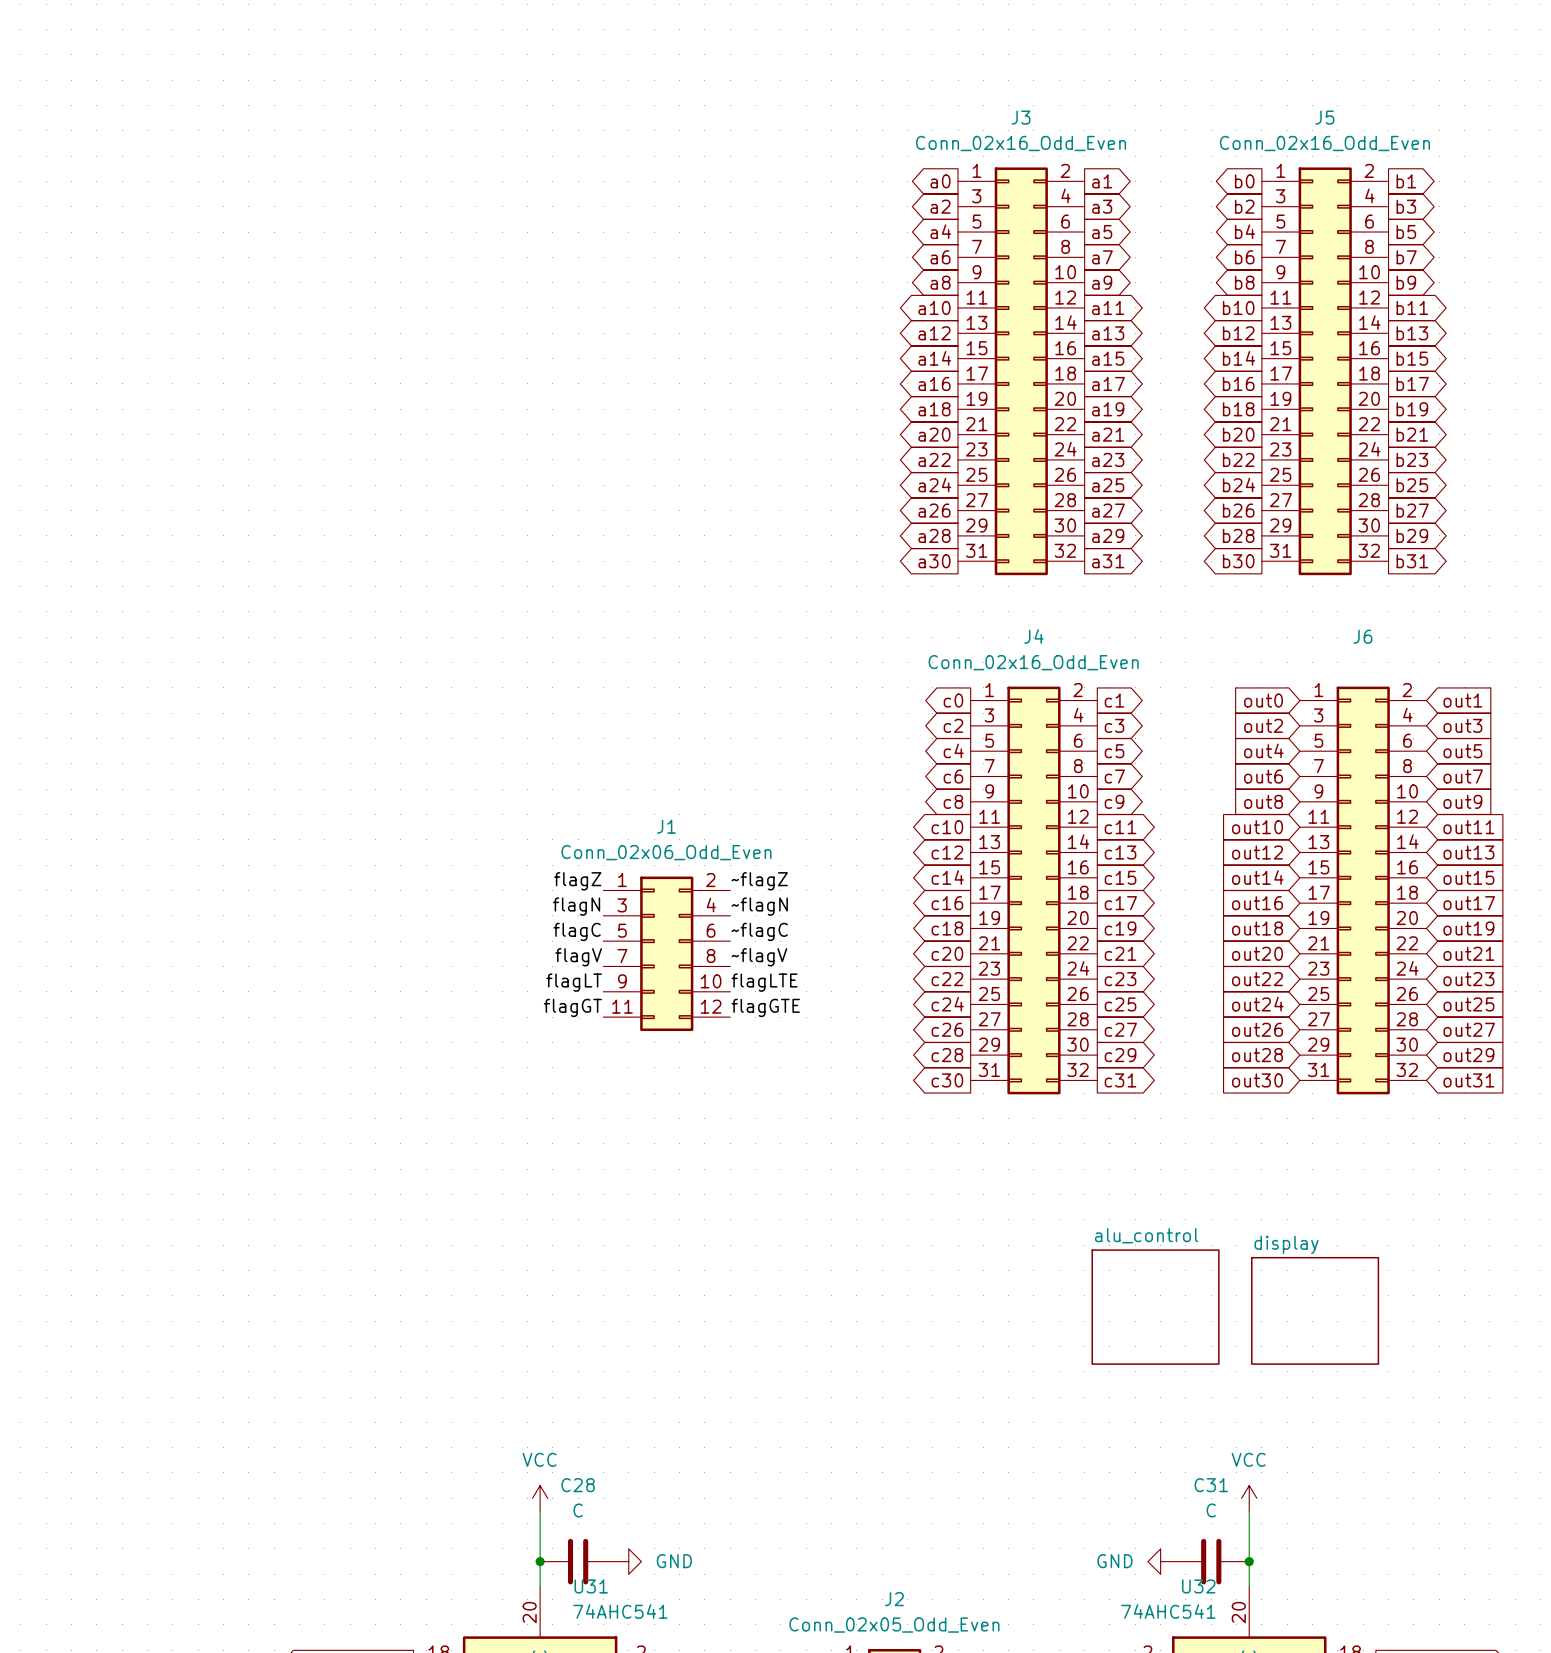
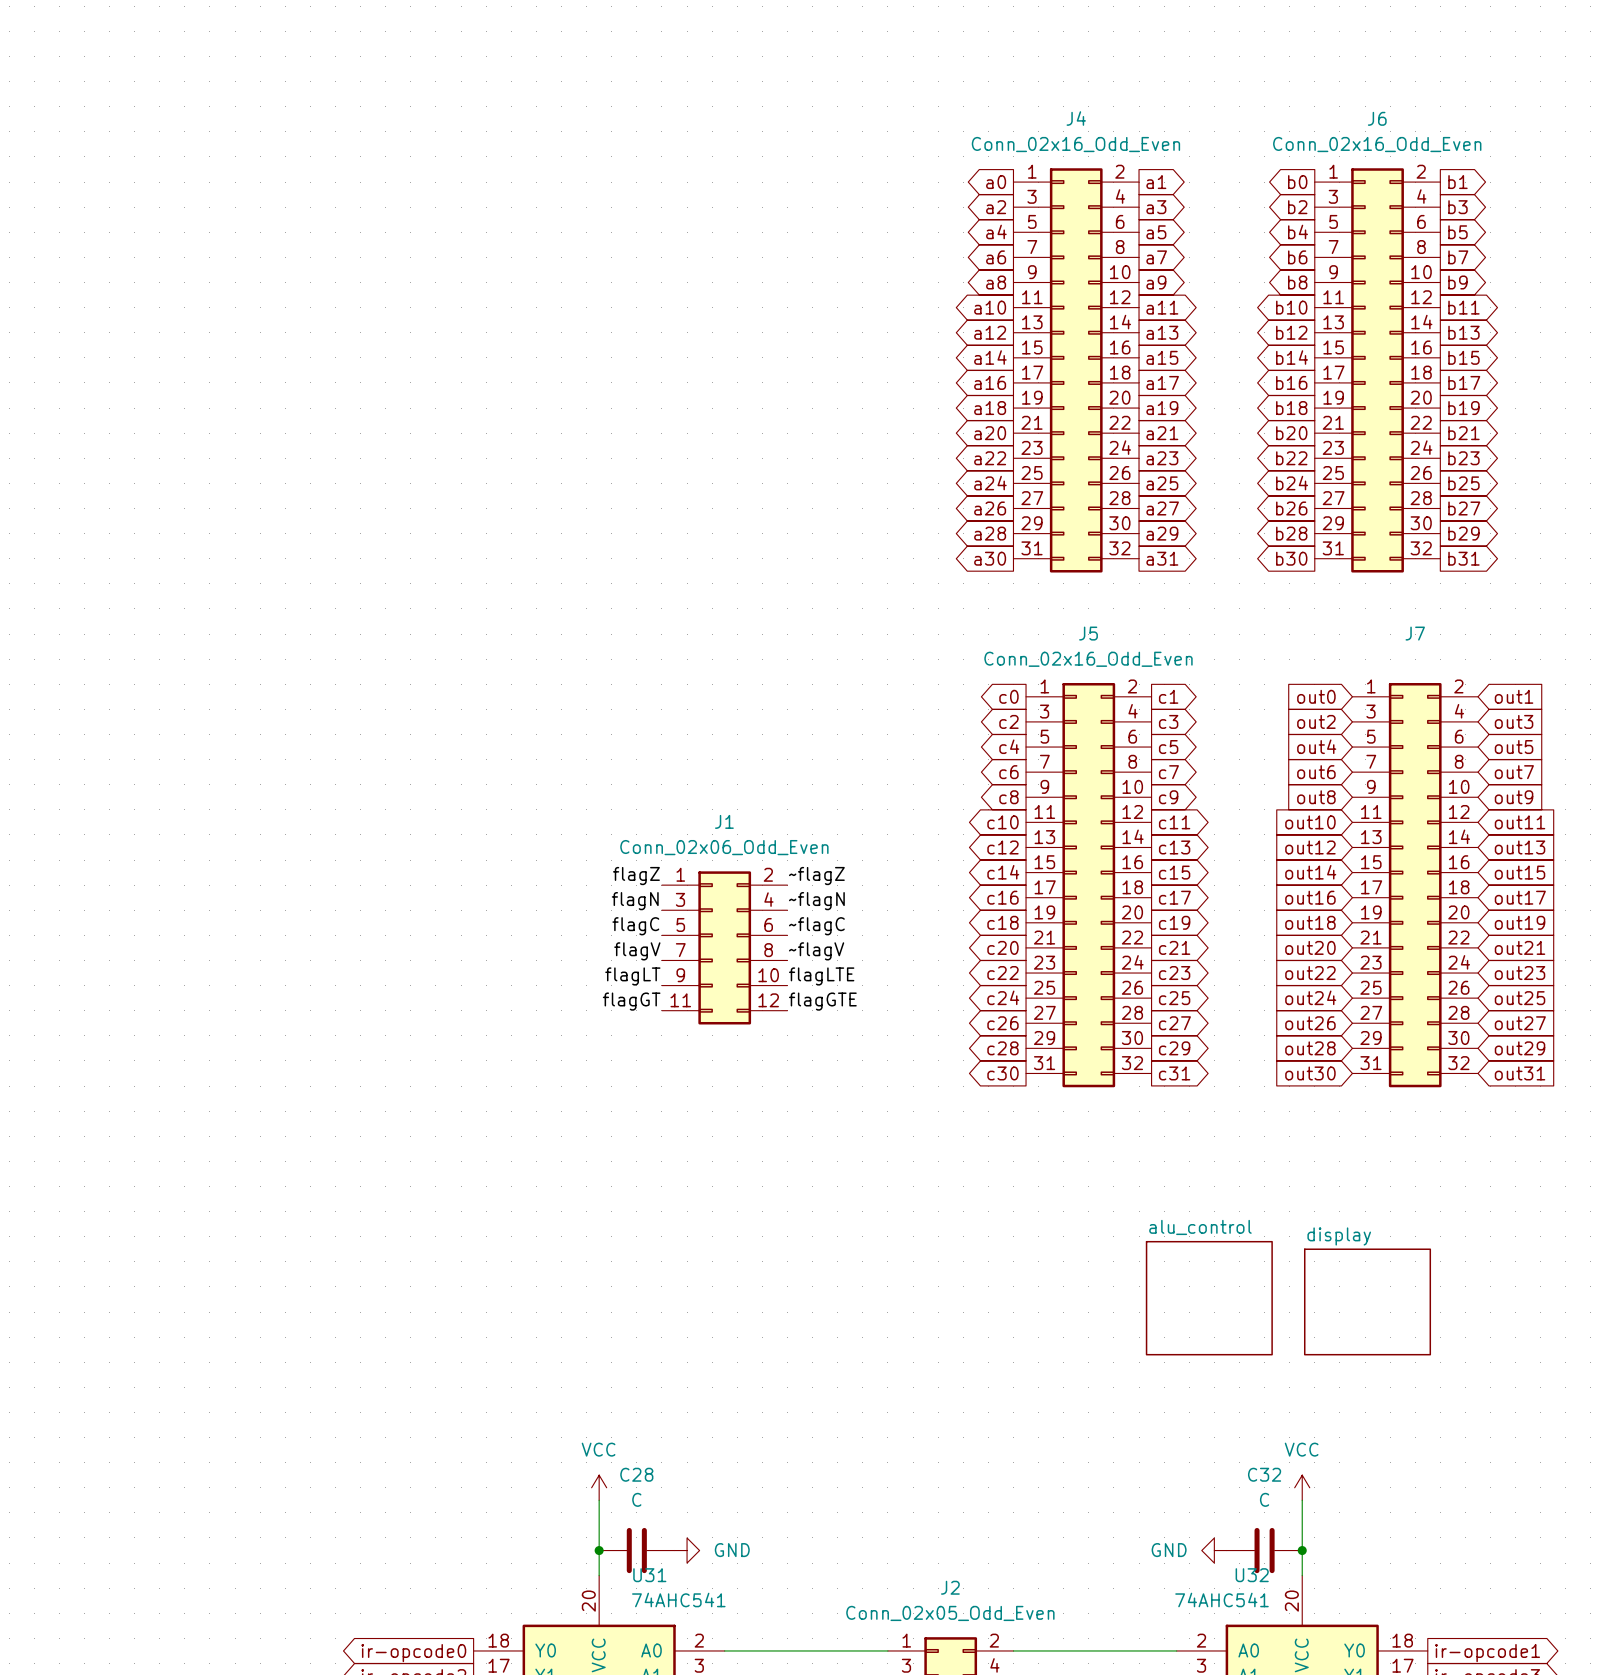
J3 name: J3 (1021, 117) -> J4 (1076, 118)
J5 name: J5 (1324, 117) -> J6 (1377, 118)
J4 name: J4 (1033, 636) -> J5 (1088, 633)
J6 name: J6 (1362, 636) -> J7 (1415, 633)
C31 name: C31 (1211, 1485) -> C32 (1264, 1474)

